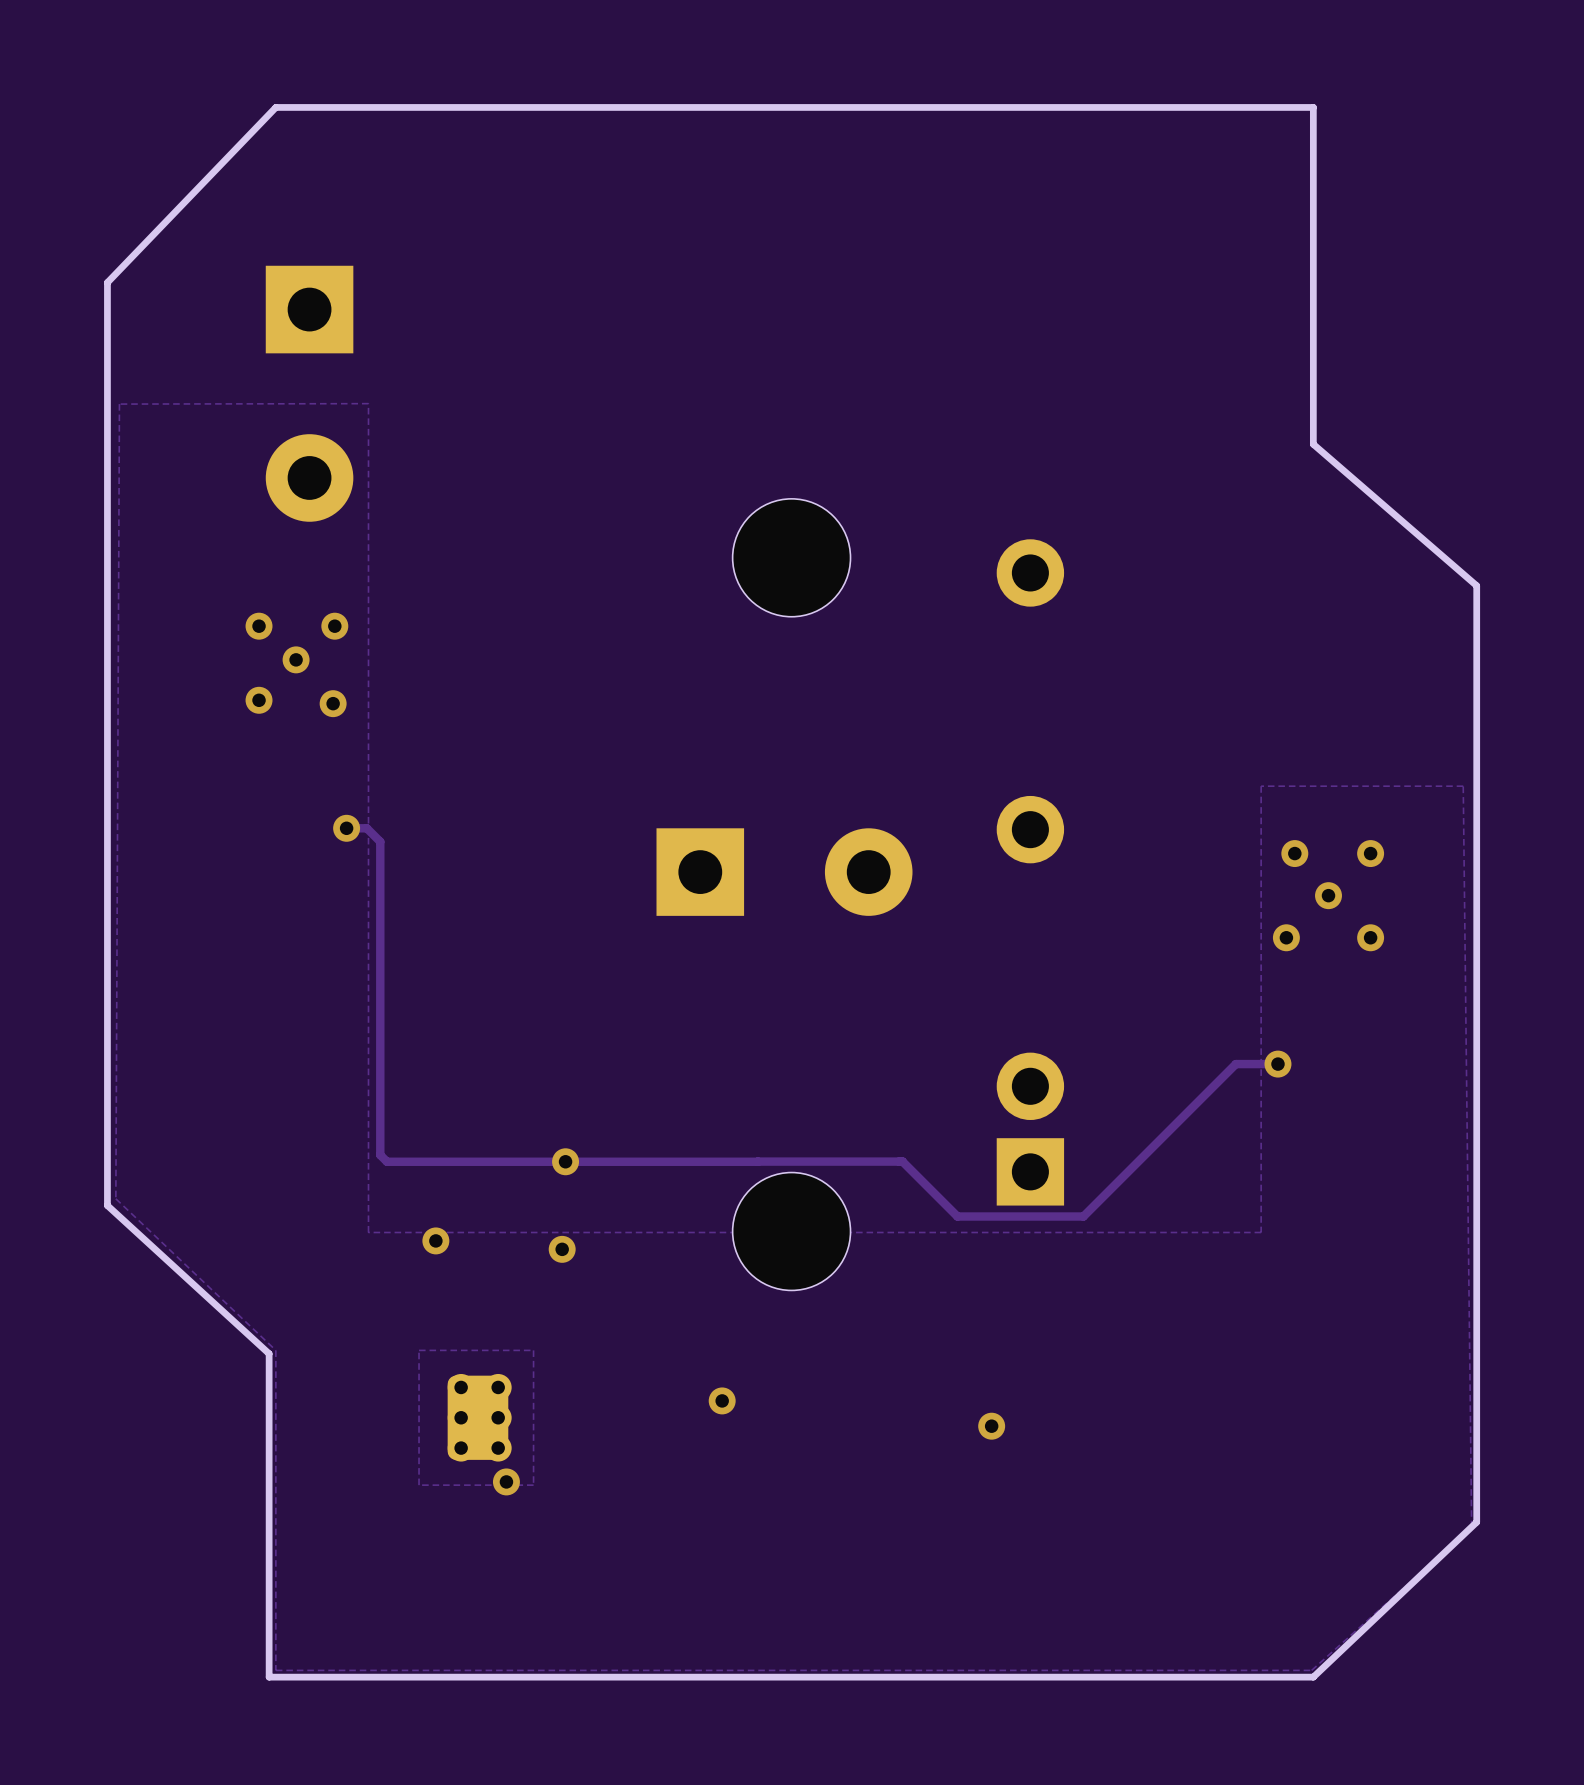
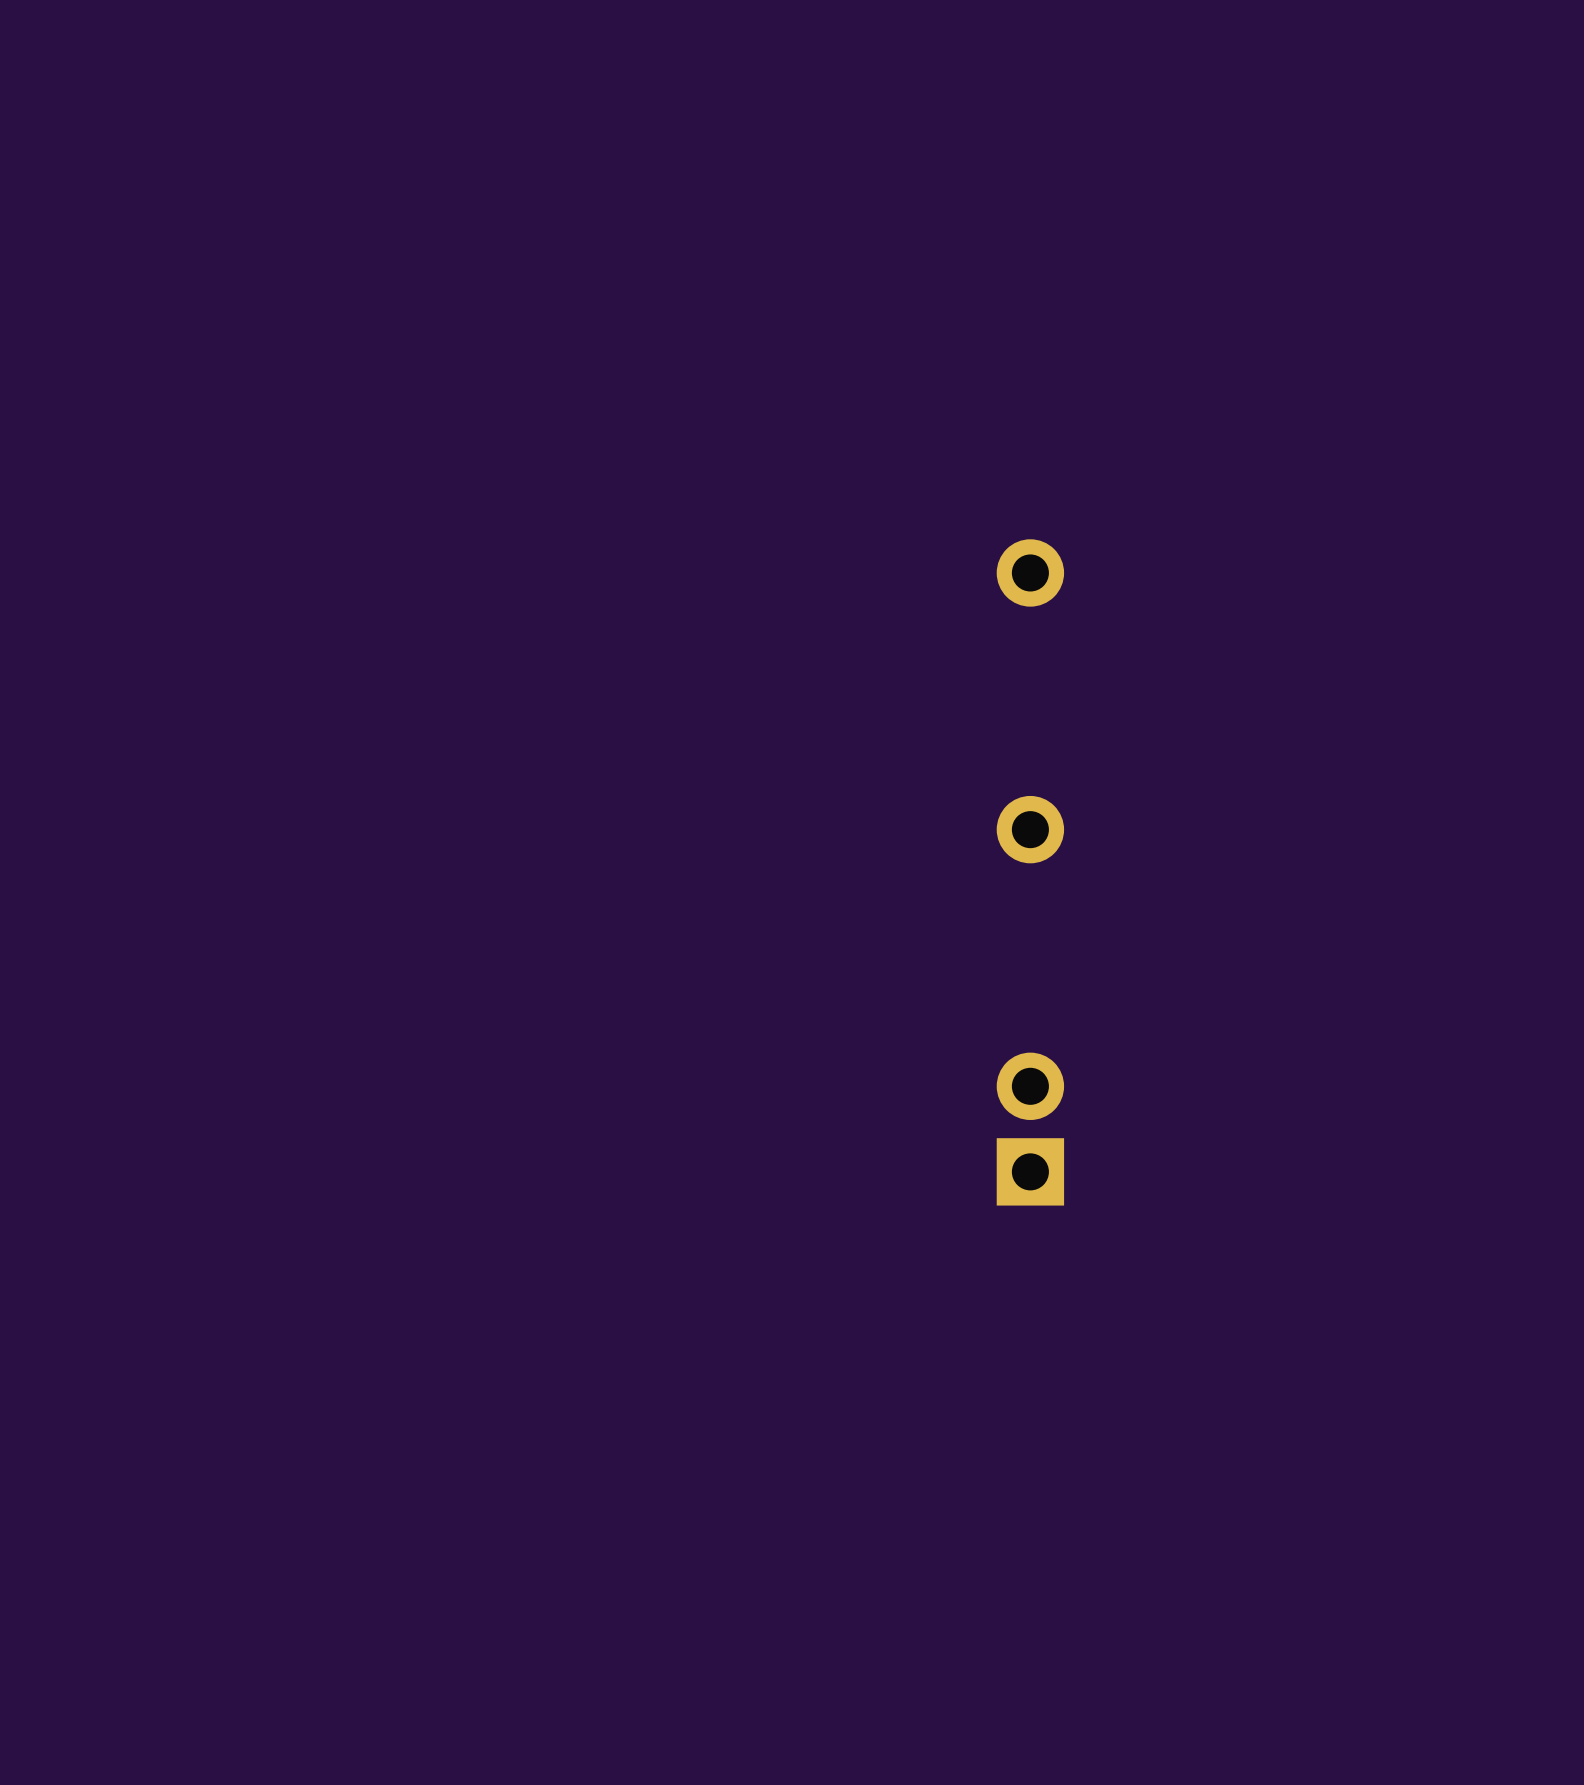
board edge: (1313, 107) (1313, 444) (1476, 585) (1476, 1522) (1313, 1677) (269, 1677) (269, 1353) (107, 1205) (107, 282) (275, 107) (1313, 107) -> none
part: (309, 393) -> none
zone outline: (368, 403) (368, 1232) (1261, 1232) (1261, 786) (1463, 786) (1471, 1527) (1311, 1670) (275, 1670) (275, 1350) (115, 1198) (119, 404) (368, 403) -> none
part: (791, 557) -> none
via: (259, 626) -> none
via: (334, 626) -> none
via: (296, 659) -> none
via: (259, 700) -> none
via: (333, 703) -> none
track: (346, 828) (366, 828) (380, 841) (380, 1155) (387, 1161) (757, 1161) -> none
via: (346, 828) -> none
via: (1294, 853) -> none
via: (1370, 853) -> none
part: (784, 872) -> none
via: (1328, 895) -> none
via: (1286, 937) -> none
via: (1370, 937) -> none
track: (1277, 1064) (1235, 1064) (1083, 1216) (957, 1216) (902, 1161) (758, 1161) -> none
via: (1277, 1064) -> none
via: (565, 1161) -> none
part: (791, 1231) -> none
via: (435, 1240) -> none
via: (562, 1249) -> none
zone outline: (533, 1350) (419, 1350) (419, 1485) (533, 1485) (533, 1350) -> none
via: (722, 1400) -> none
part: (479, 1417) -> none
via: (991, 1426) -> none
via: (506, 1481) -> none

